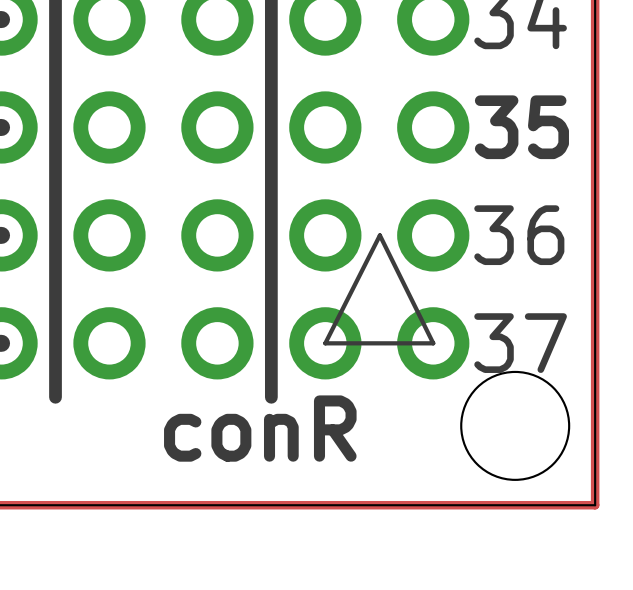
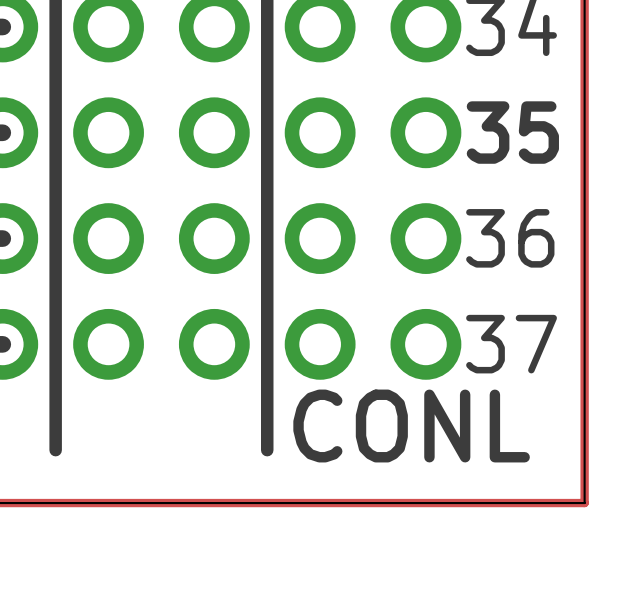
line: (379, 235) (433, 343) (325, 343) (379, 235) -> none
round board edge: [460, 370, 571, 481] -> none
line: none -> (55, 397) (55, 450)
line: none -> (267, 397) (267, 450)
text: none -> CONL (411, 426)
text: conR (260, 428) -> none

